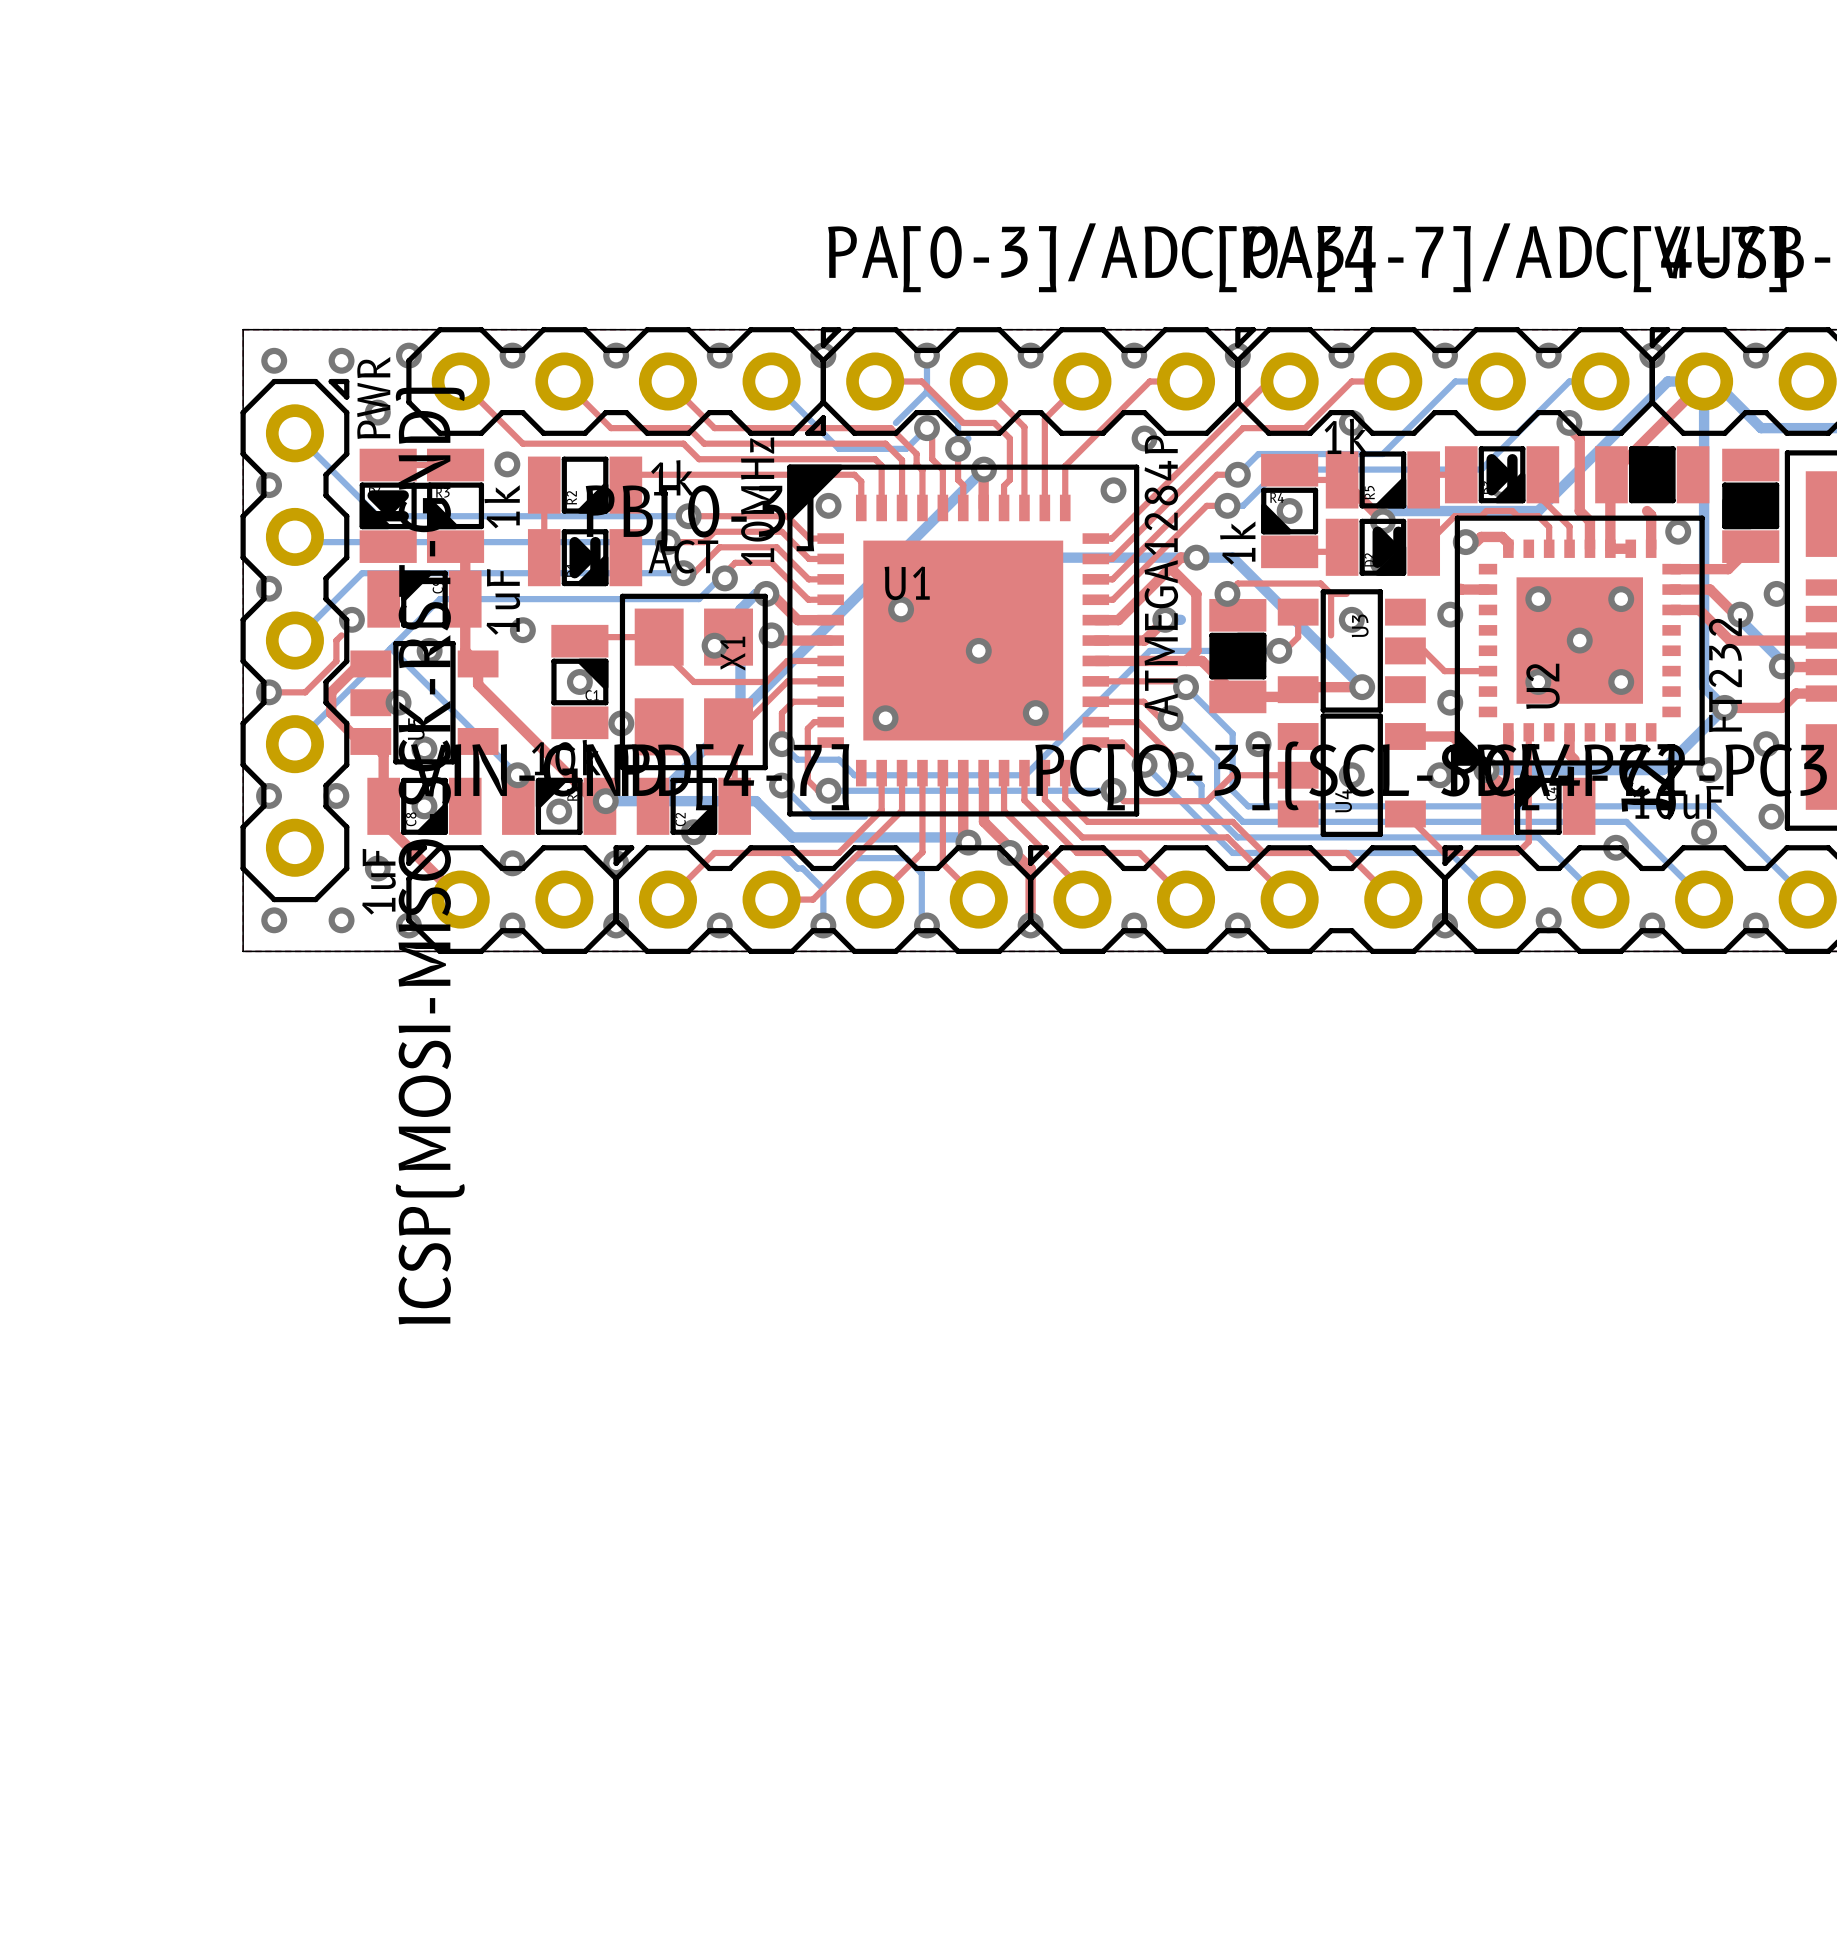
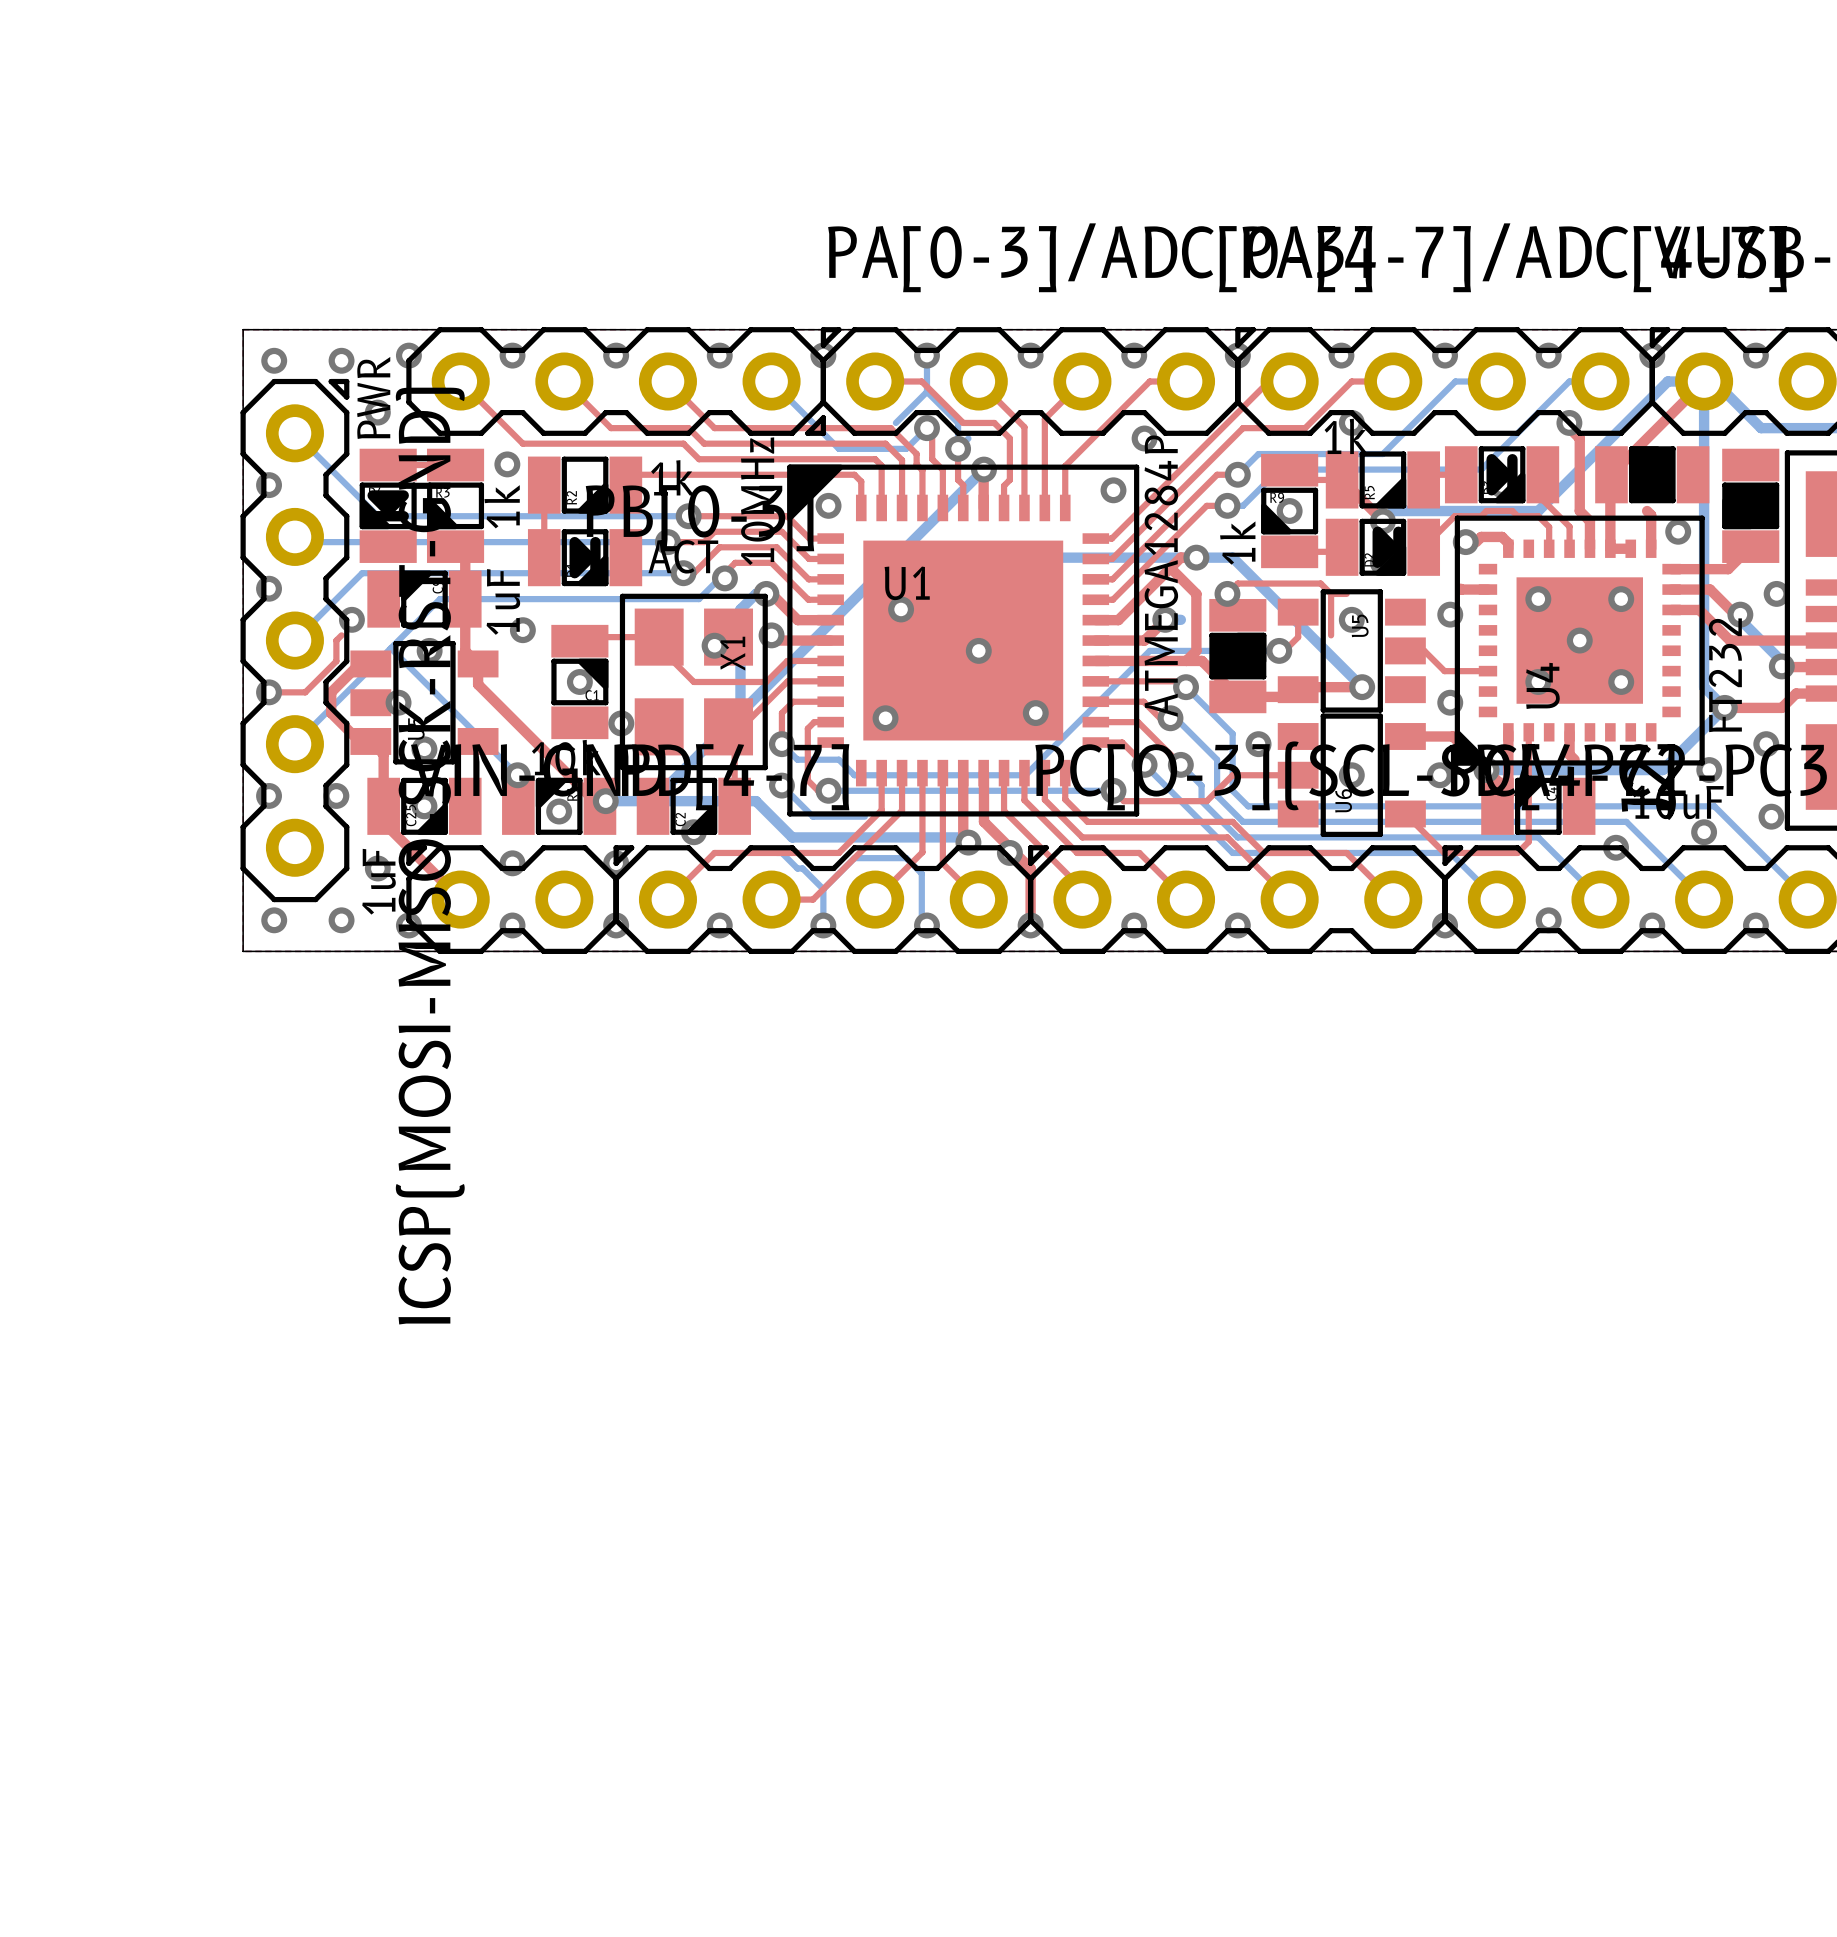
R4 name: R4 (1277, 497) -> R9 (1277, 497)
U3 name: U3 (1360, 625) -> U5 (1360, 625)
U2 name: U2 (1542, 686) -> U4 (1542, 685)
U4 name: U4 (1343, 800) -> U6 (1343, 800)
C8 name: C8 (411, 819) -> C25 (411, 815)

